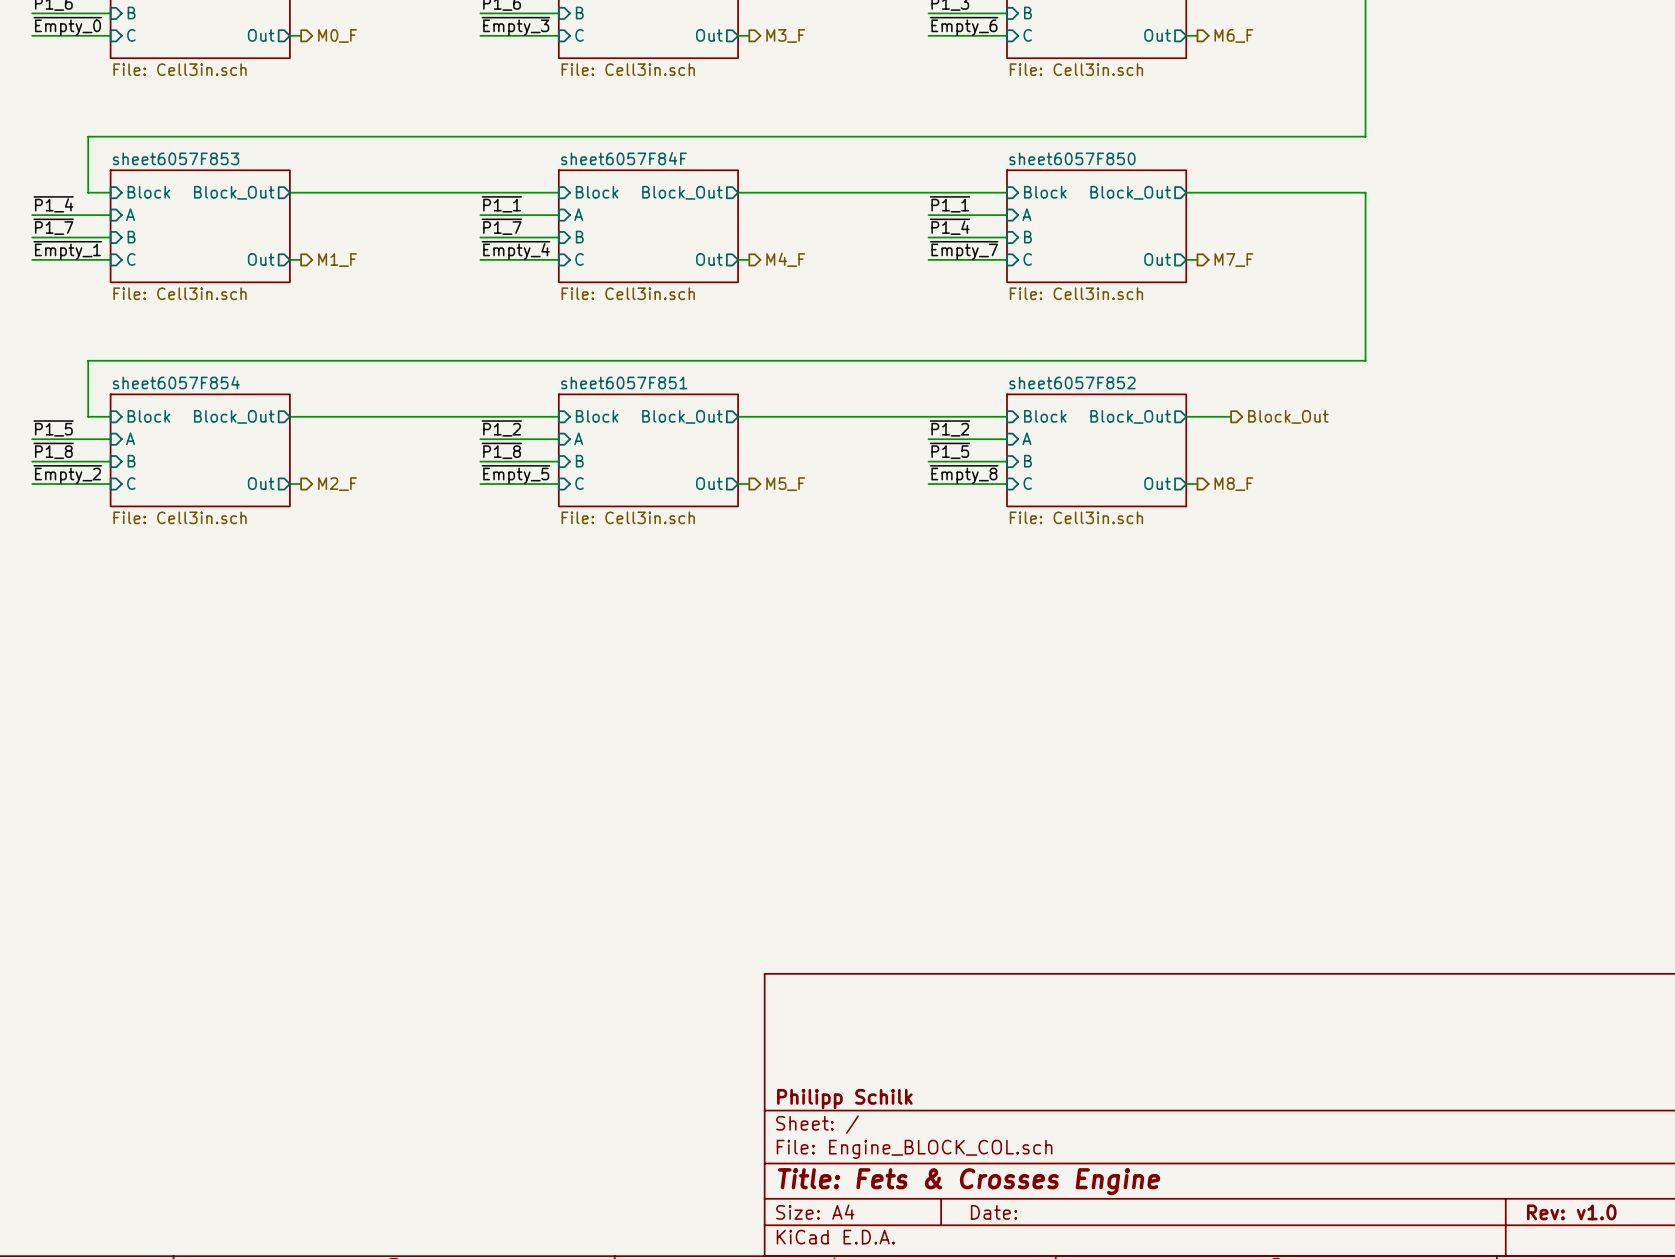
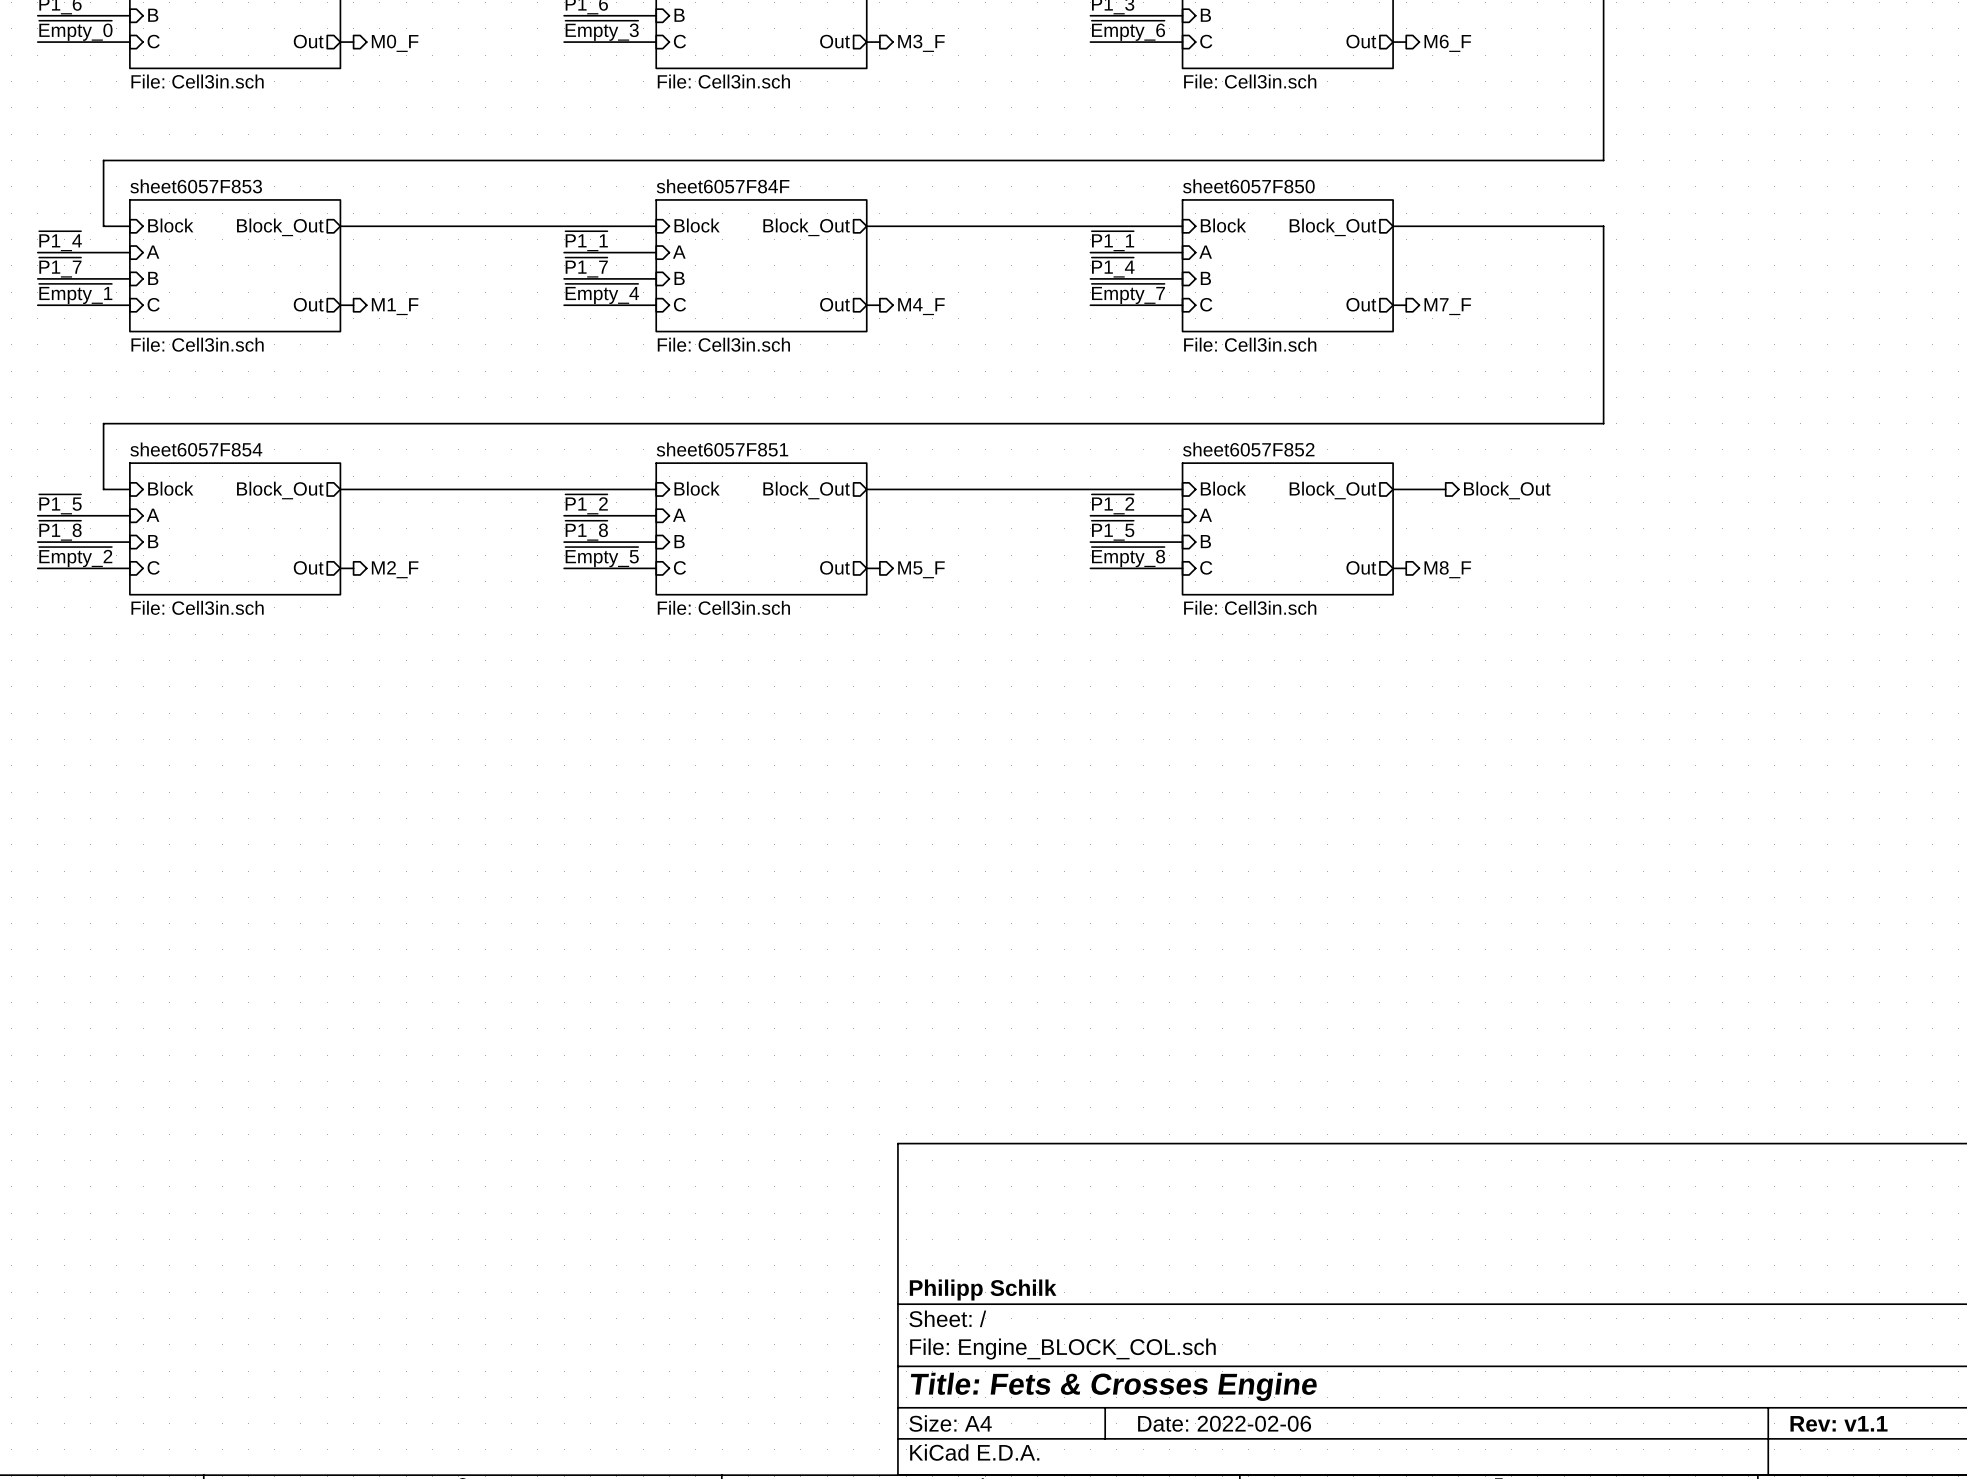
title block: Date: (993, 1212) -> Date: 2022-02-06 (1224, 1423)
title block: Rev: v1.0 (1571, 1212) -> Rev: v1.1 (1839, 1423)

